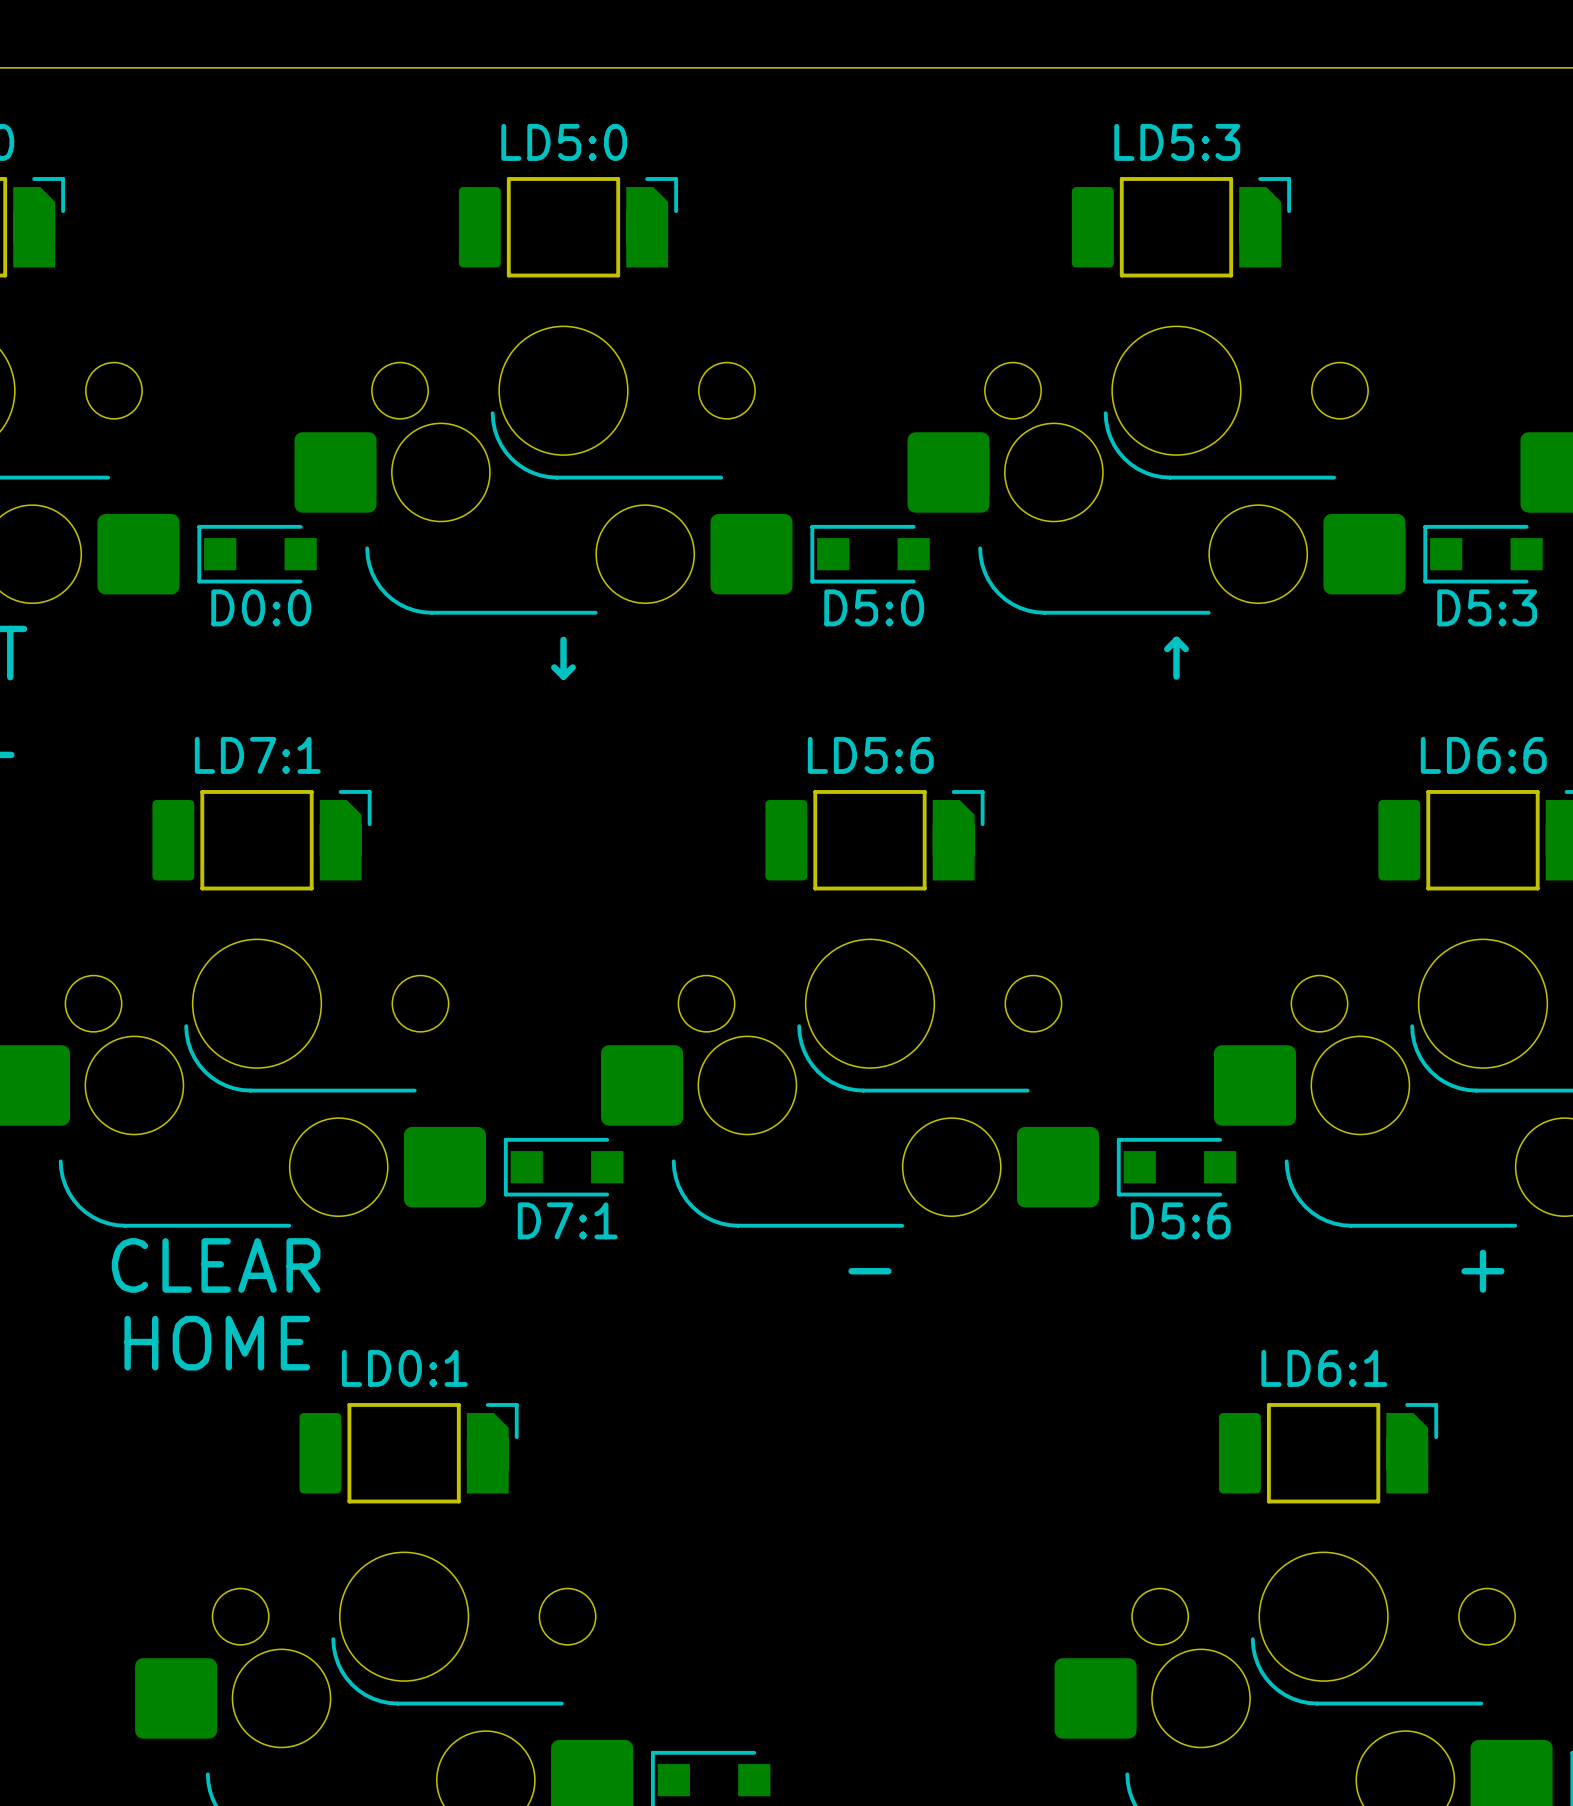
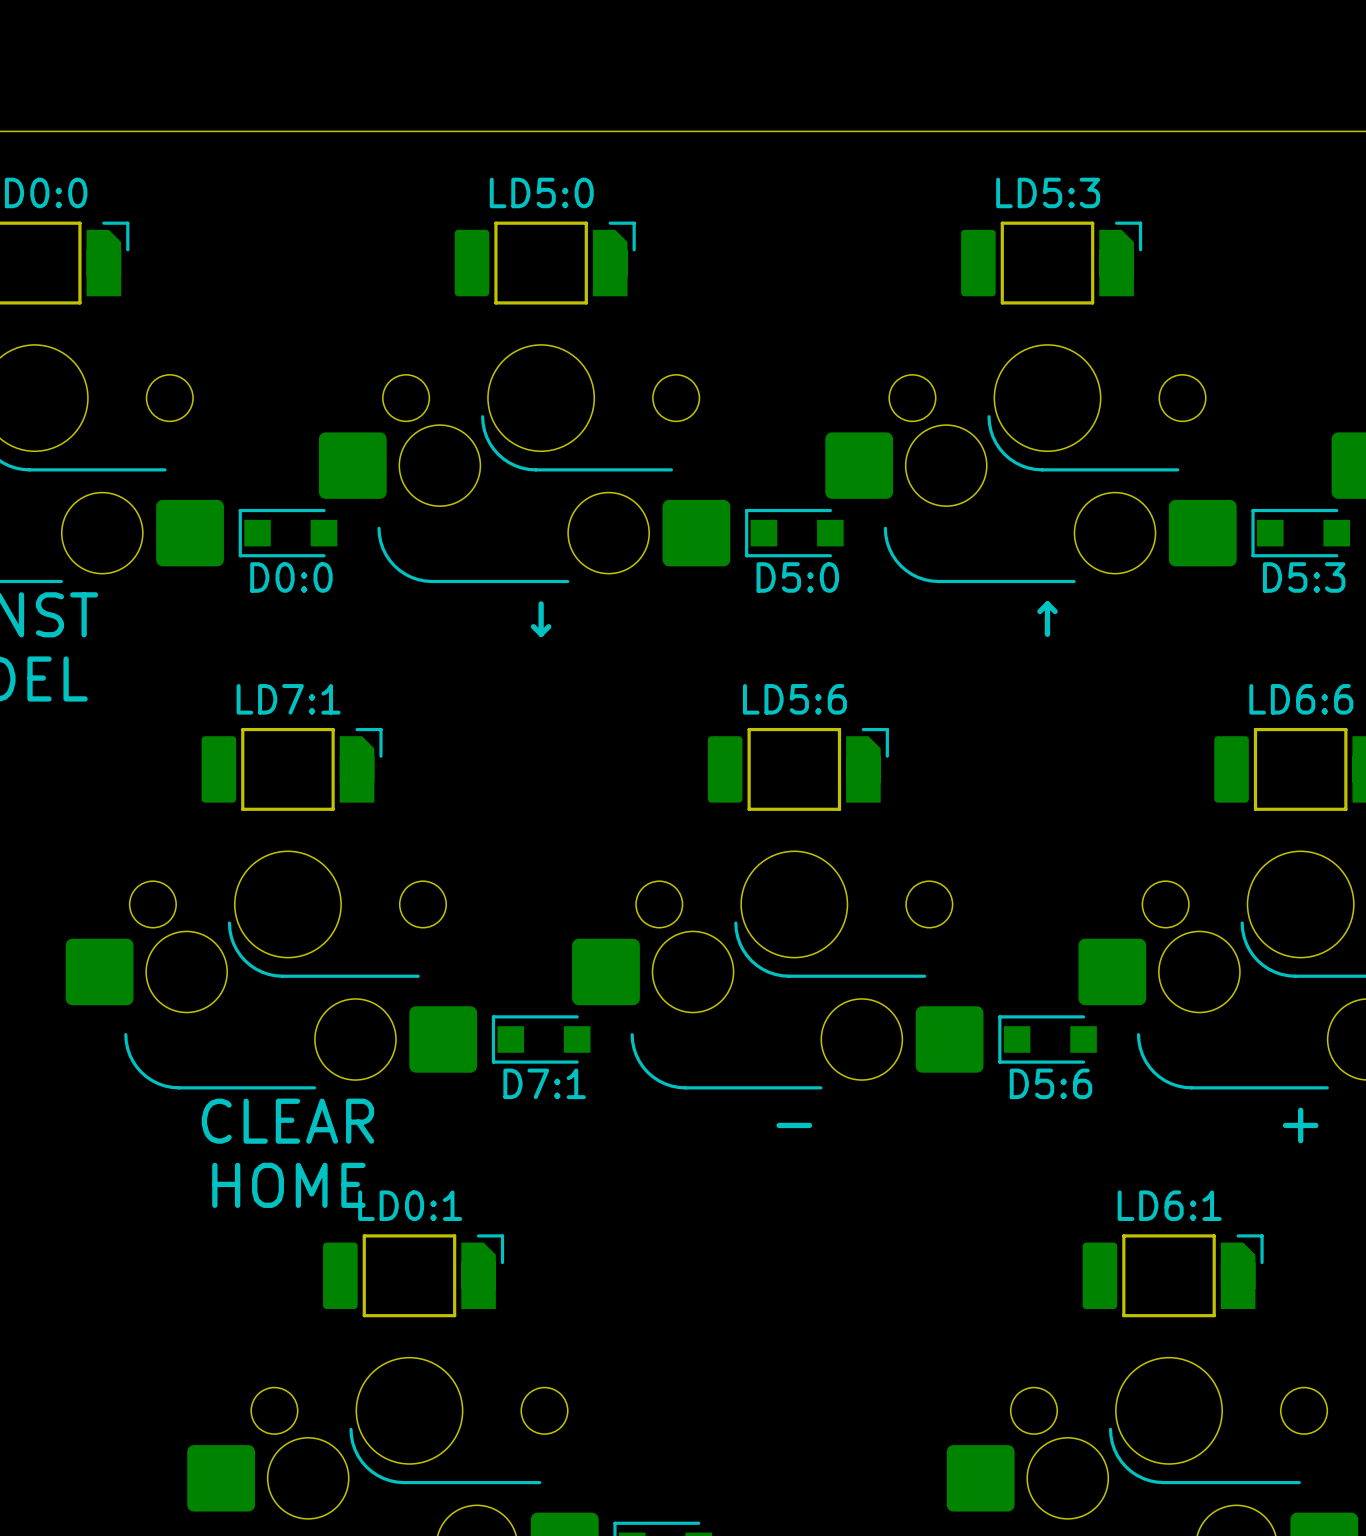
text position: CLEAR (216, 1265) -> CLEAR (287, 1121)
text position: HOME (217, 1343) -> HOME (288, 1185)

